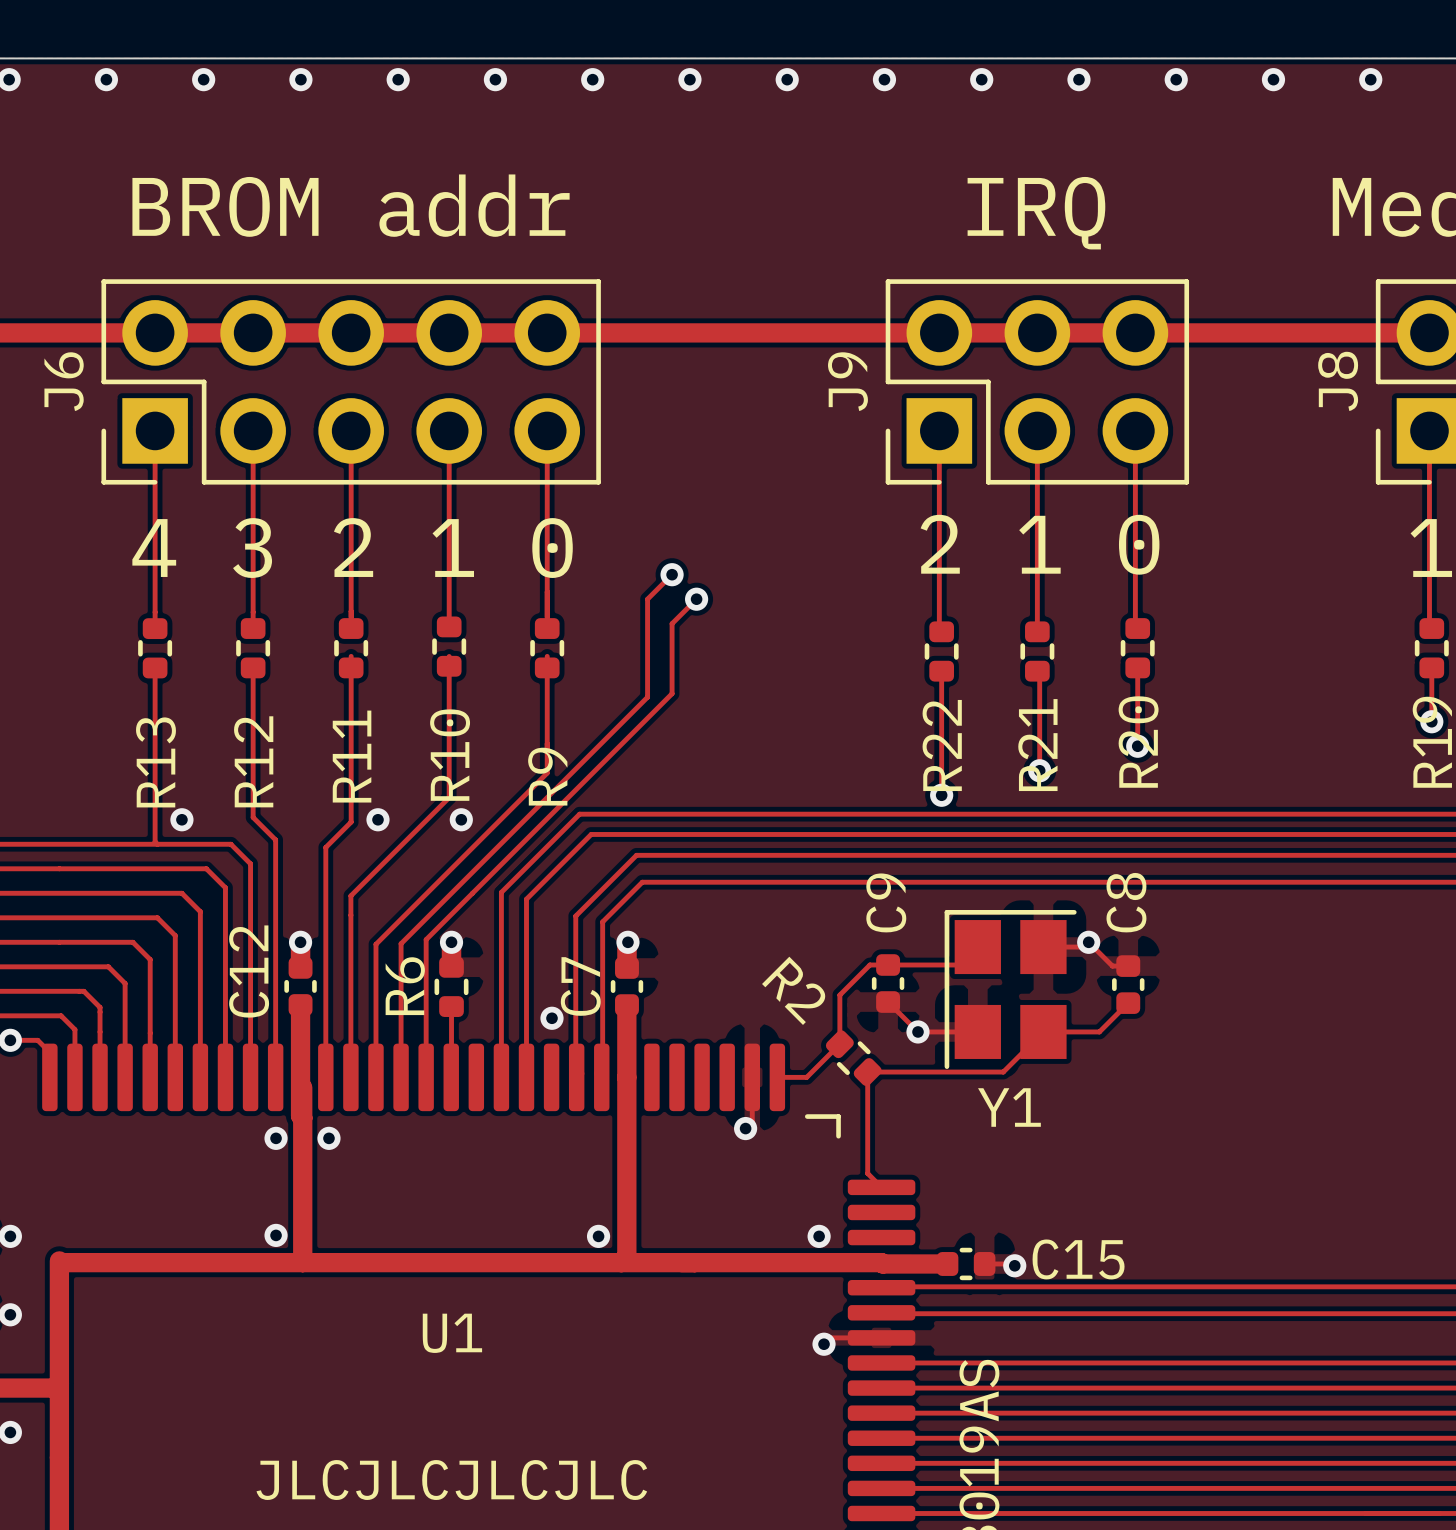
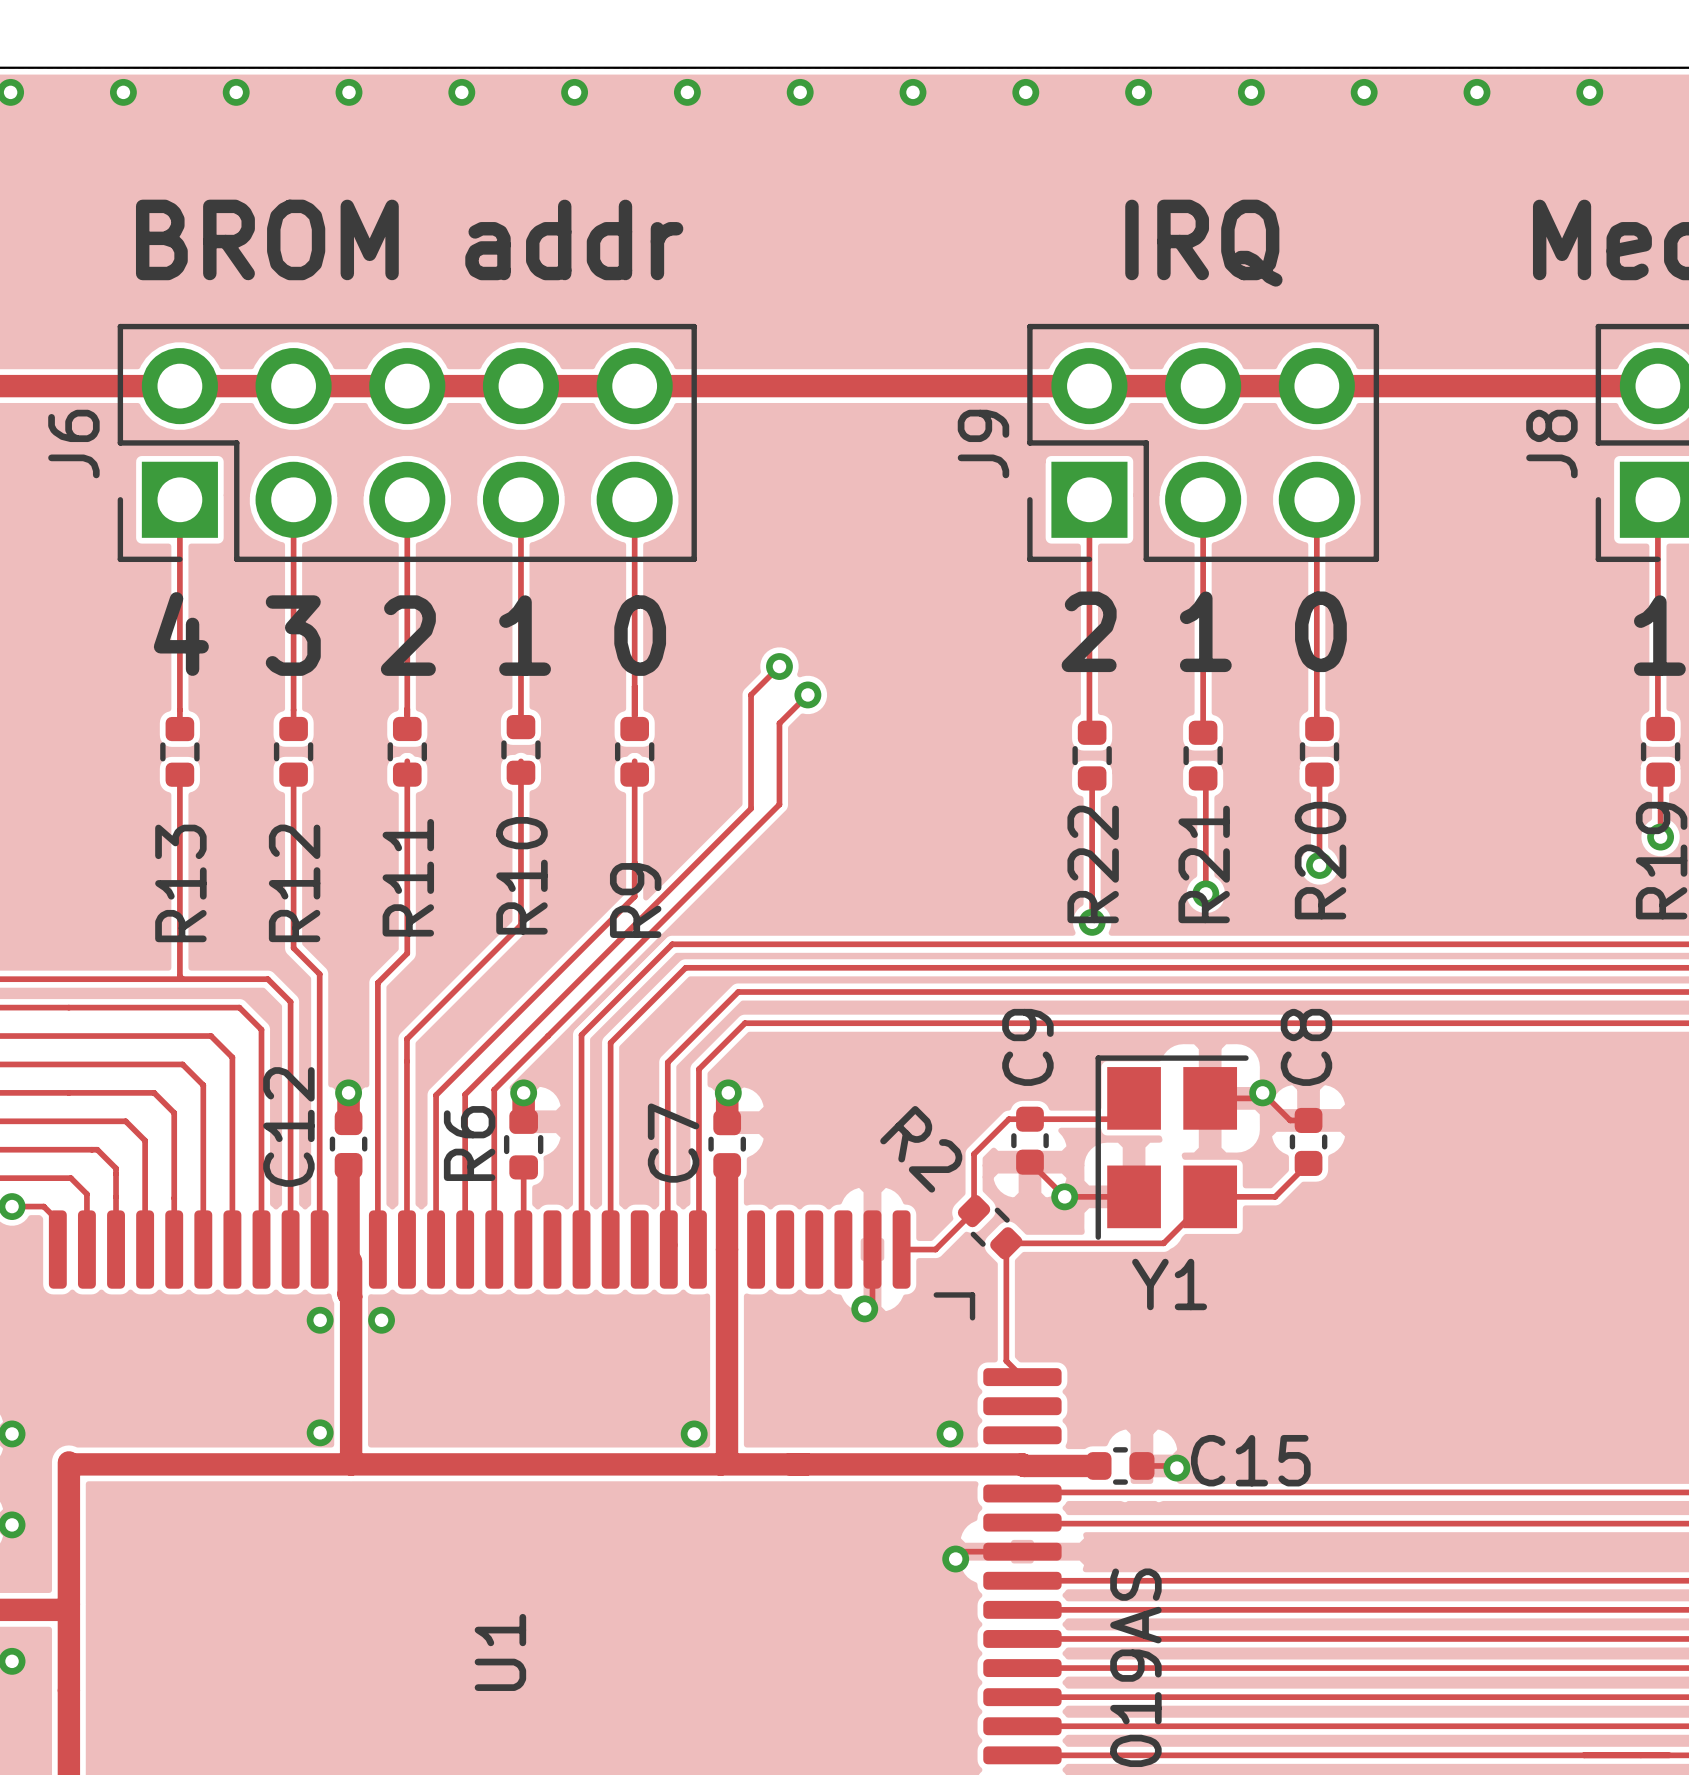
via: (181, 819) -> none
via: (377, 819) -> none
via: (461, 819) -> none
via: (551, 1018) -> none
U1 name rotation: 0° (452, 1333) -> 90° counterclockwise (500, 1652)
text: JLCJLCJLCJLC (451, 1480) -> none

